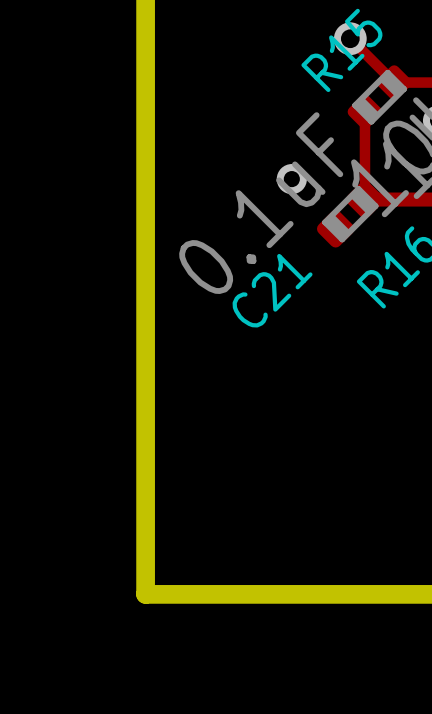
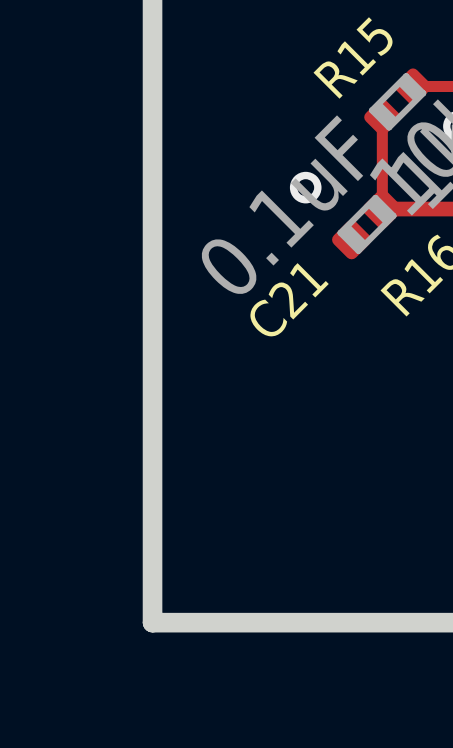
top track: (350, 38) (394, 82) -> none
via: (350, 38) -> none

